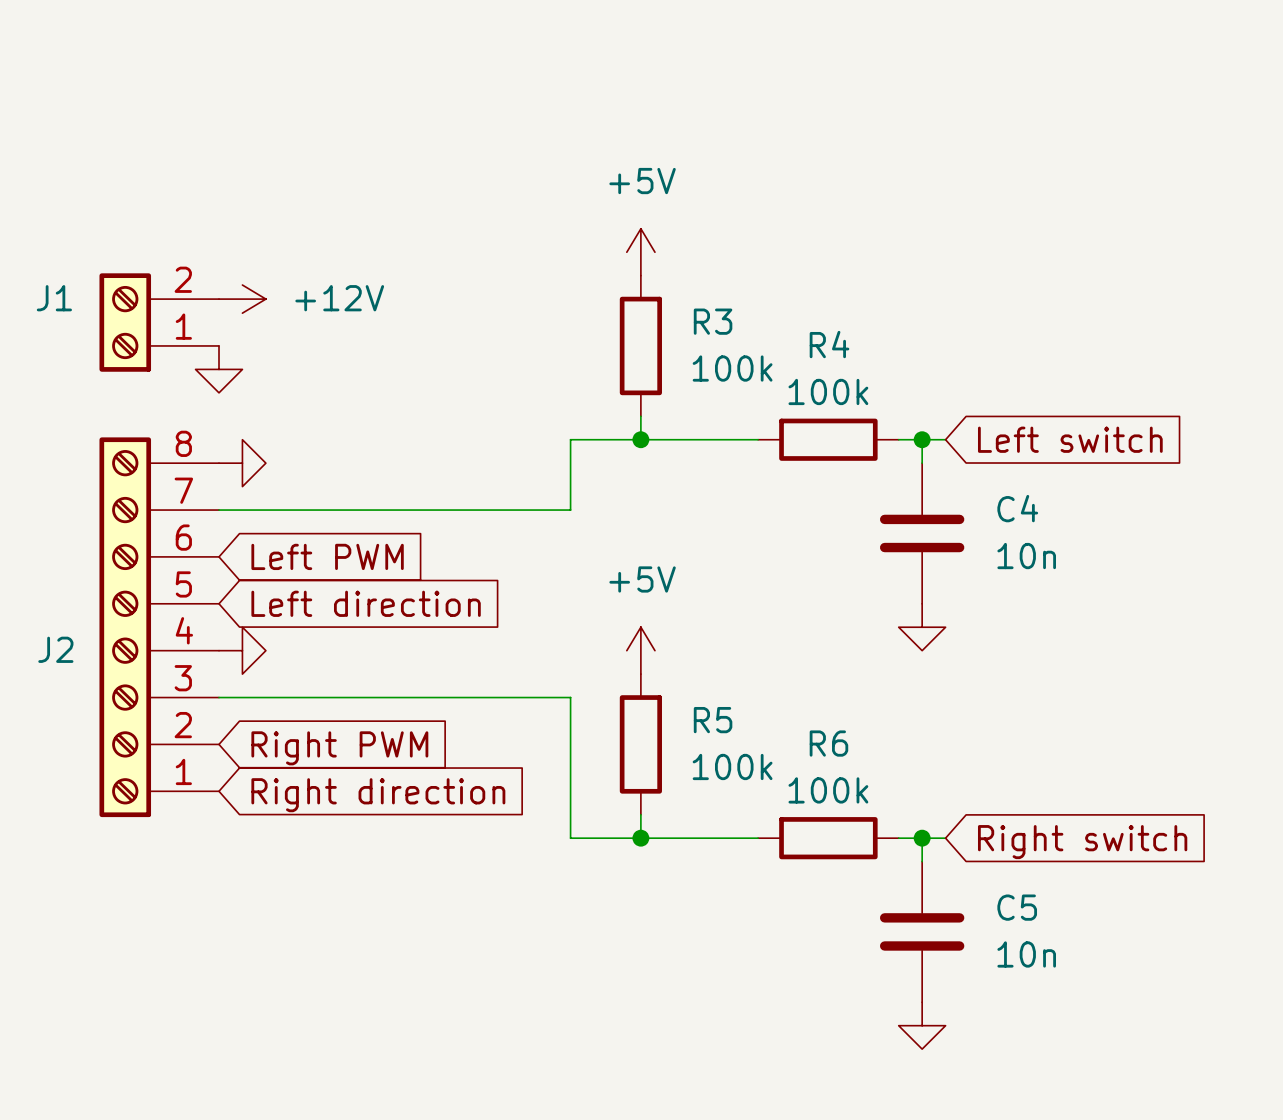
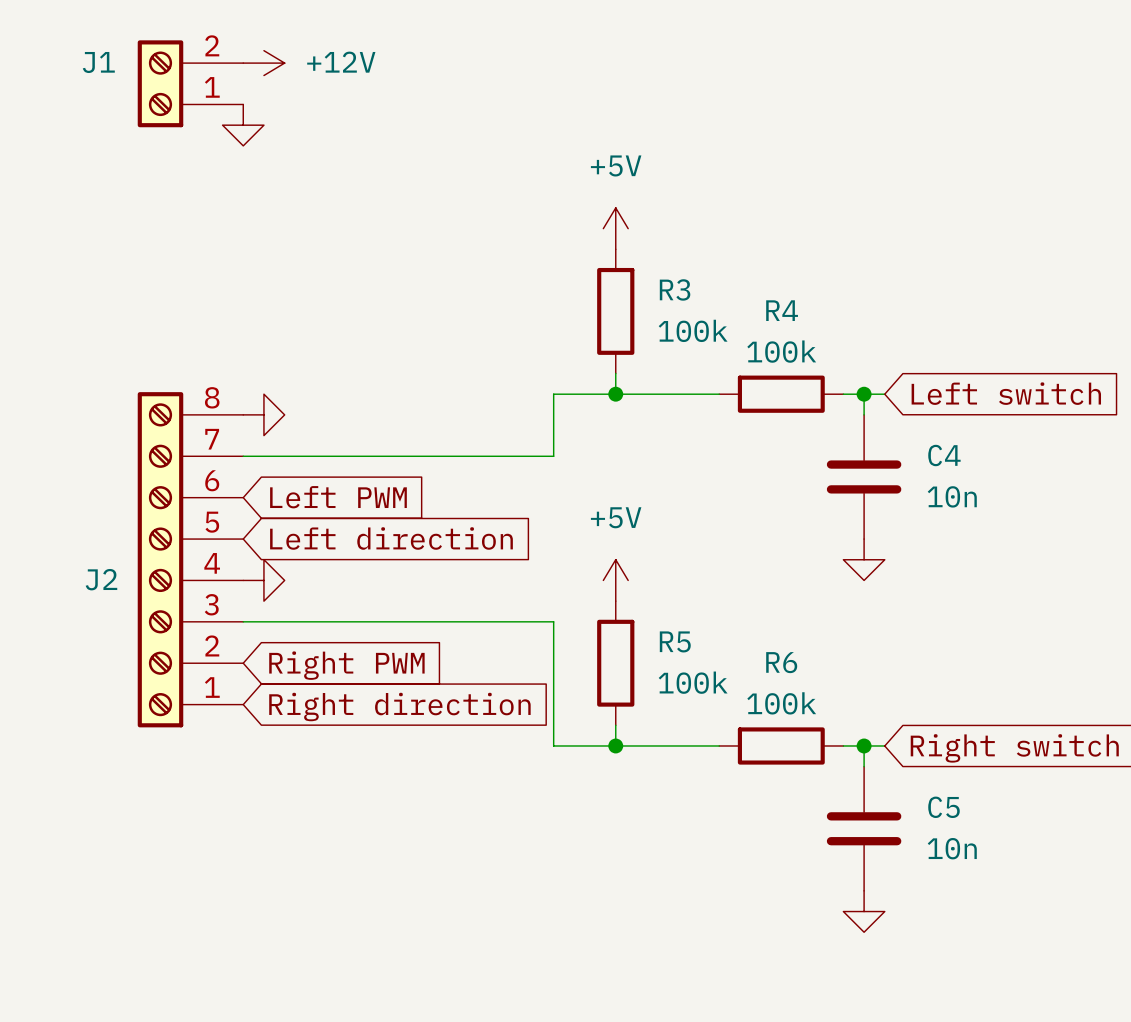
power symbol position: +12V (242, 299) -> +12V (263, 63)
J1 position: (159, 322) -> (190, 83)
power symbol position: (219, 369) -> (243, 125)

